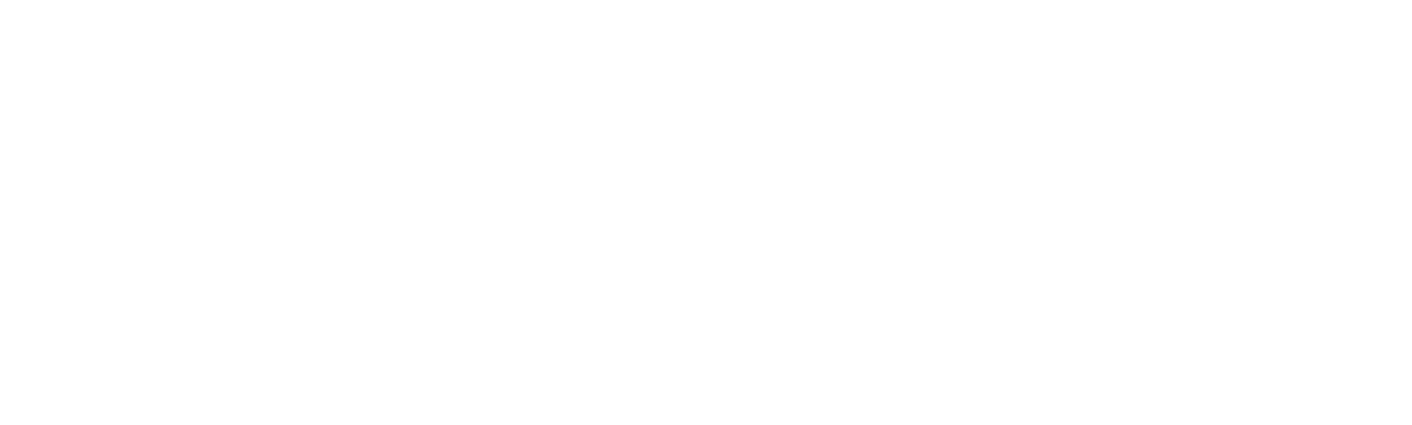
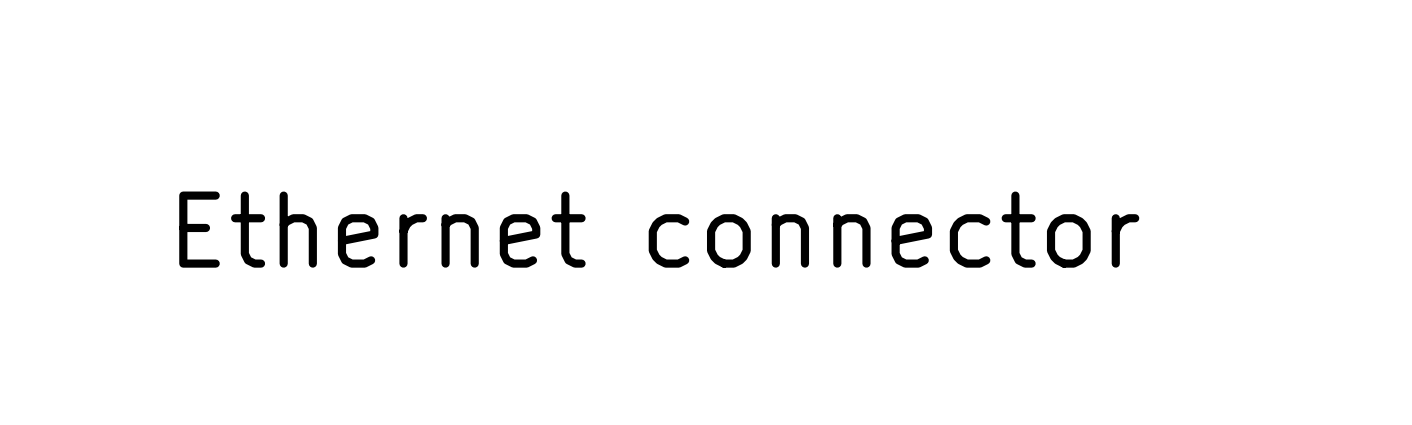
text: none -> Ethernet connector (659, 229)

